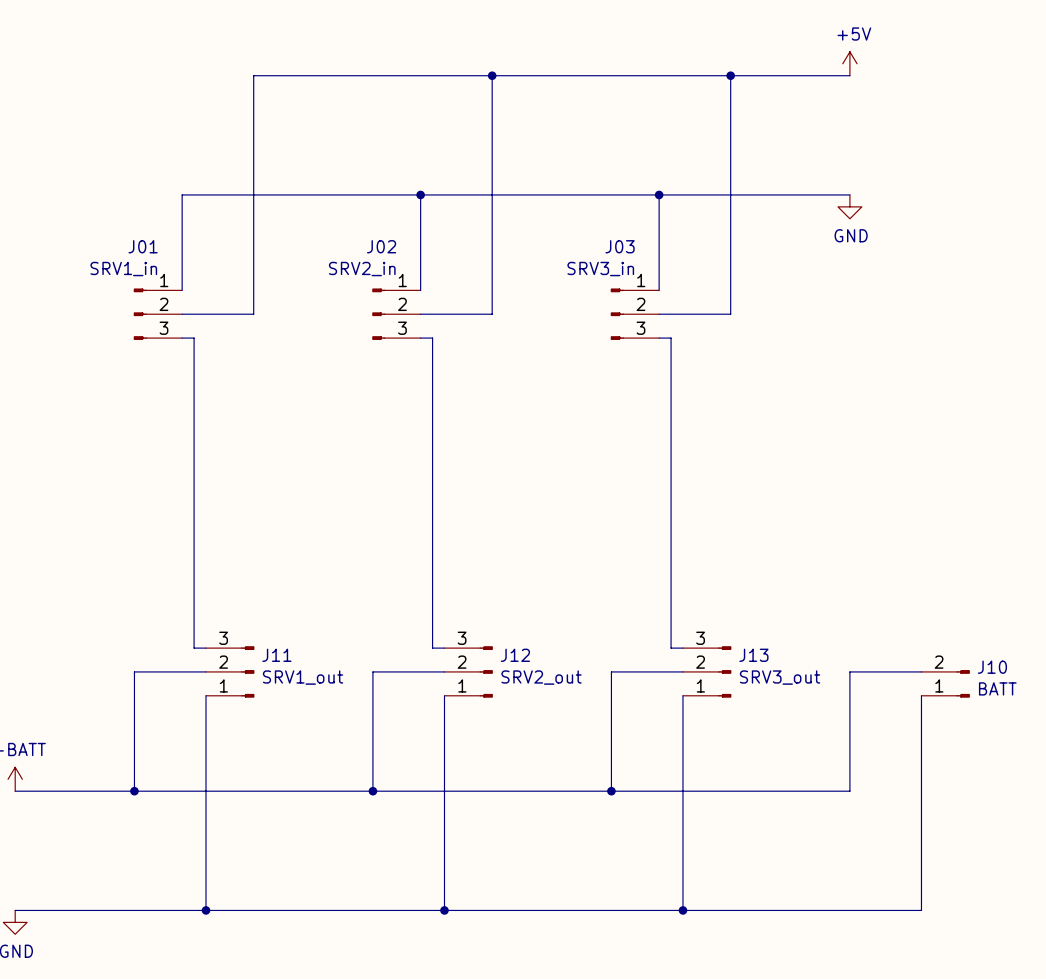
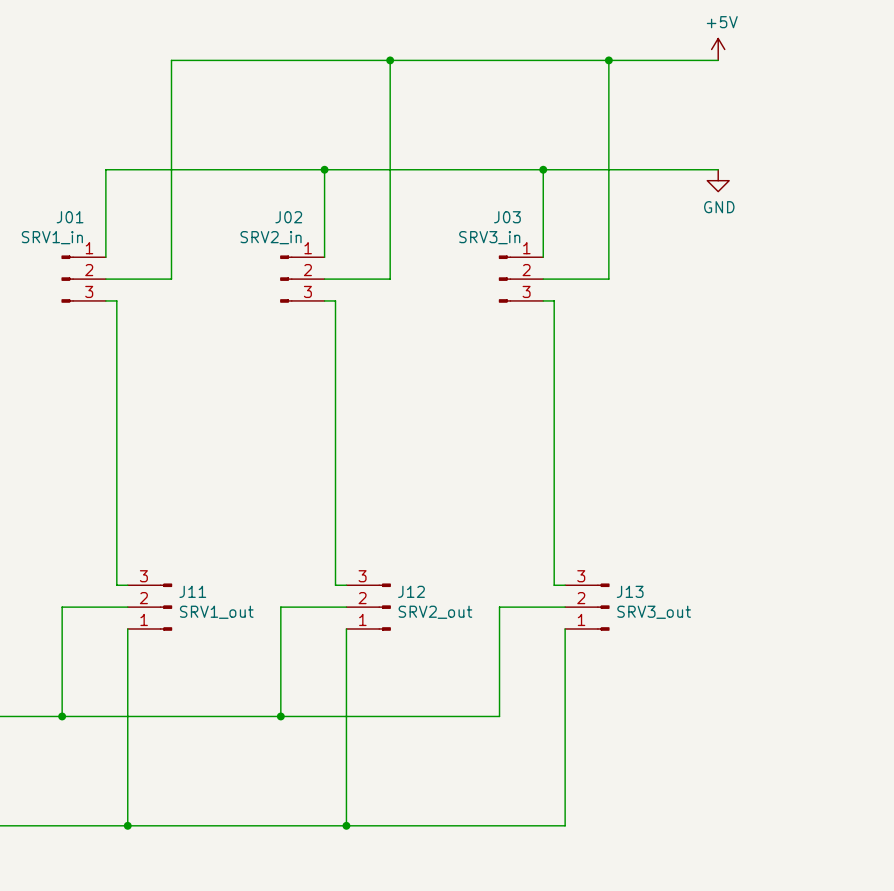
wire: (921, 671) (849, 671) (849, 791) (611, 791) -> none
J10: BATT (945, 683) -> none
wire: (921, 695) (921, 910) (682, 910) -> none
junction: (611, 791) -> none
junction: (682, 910) -> none

